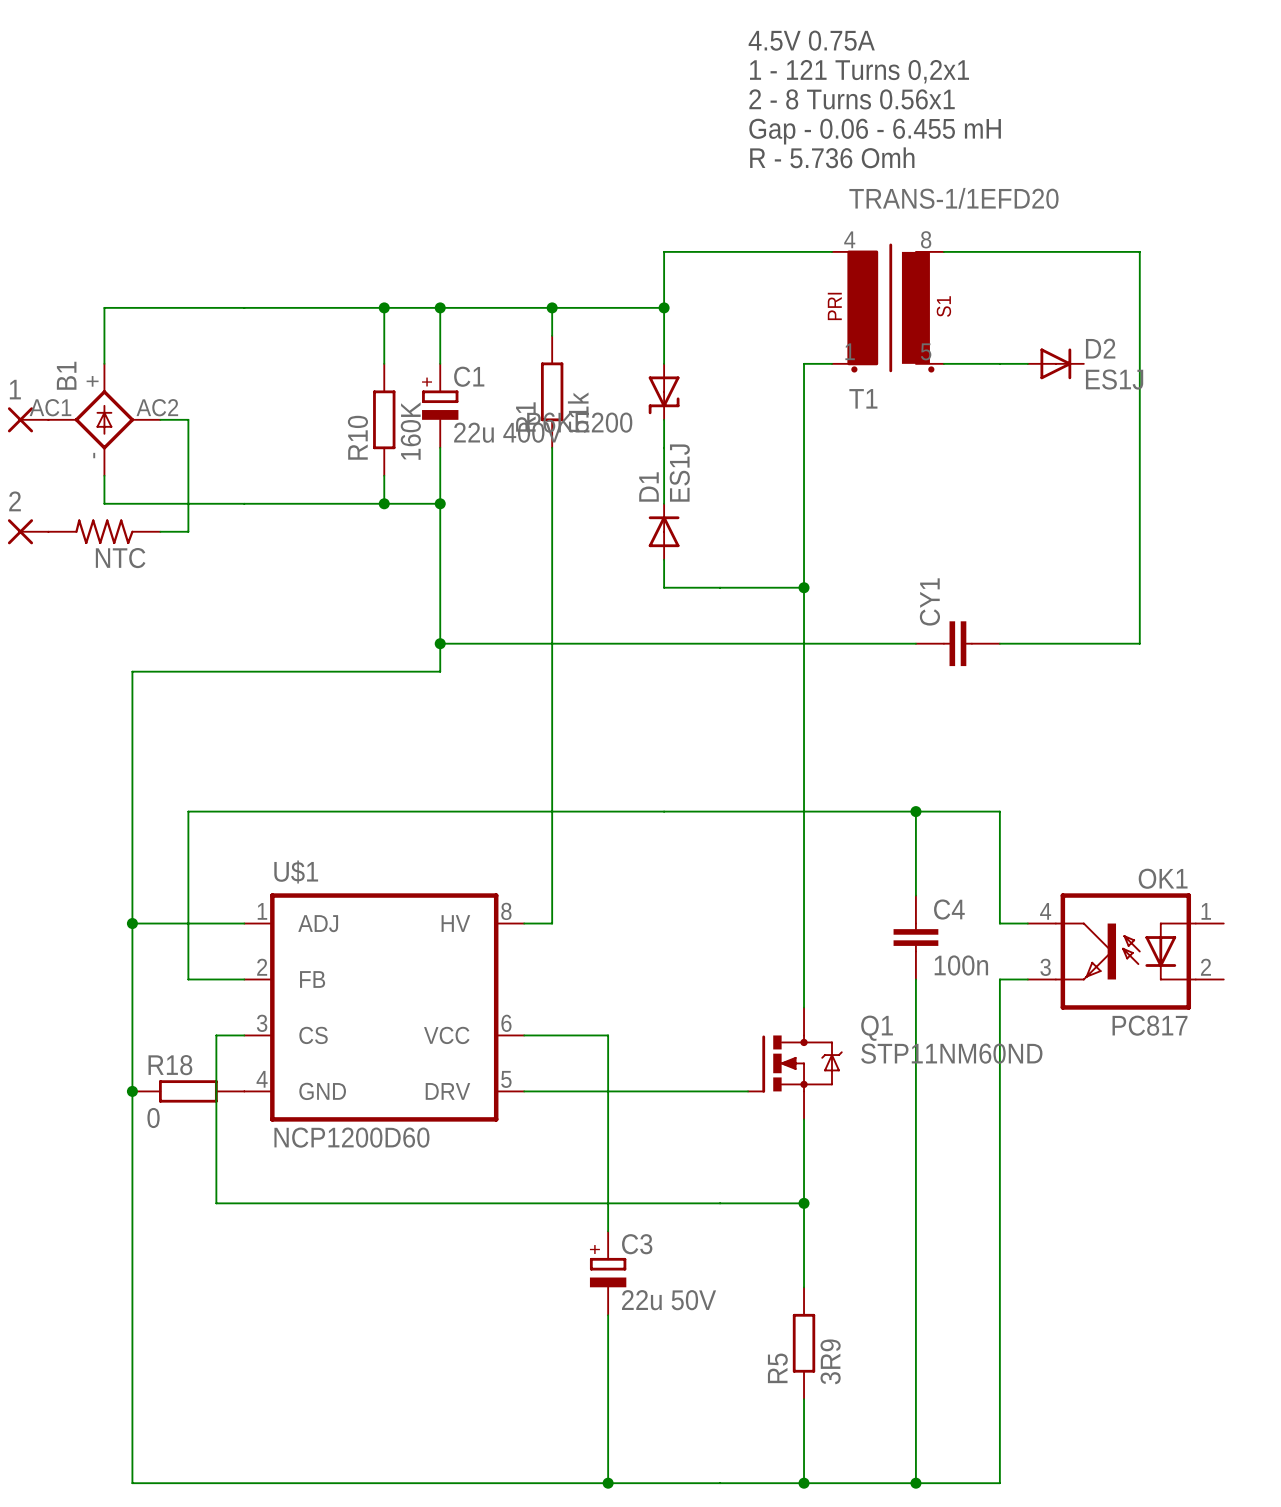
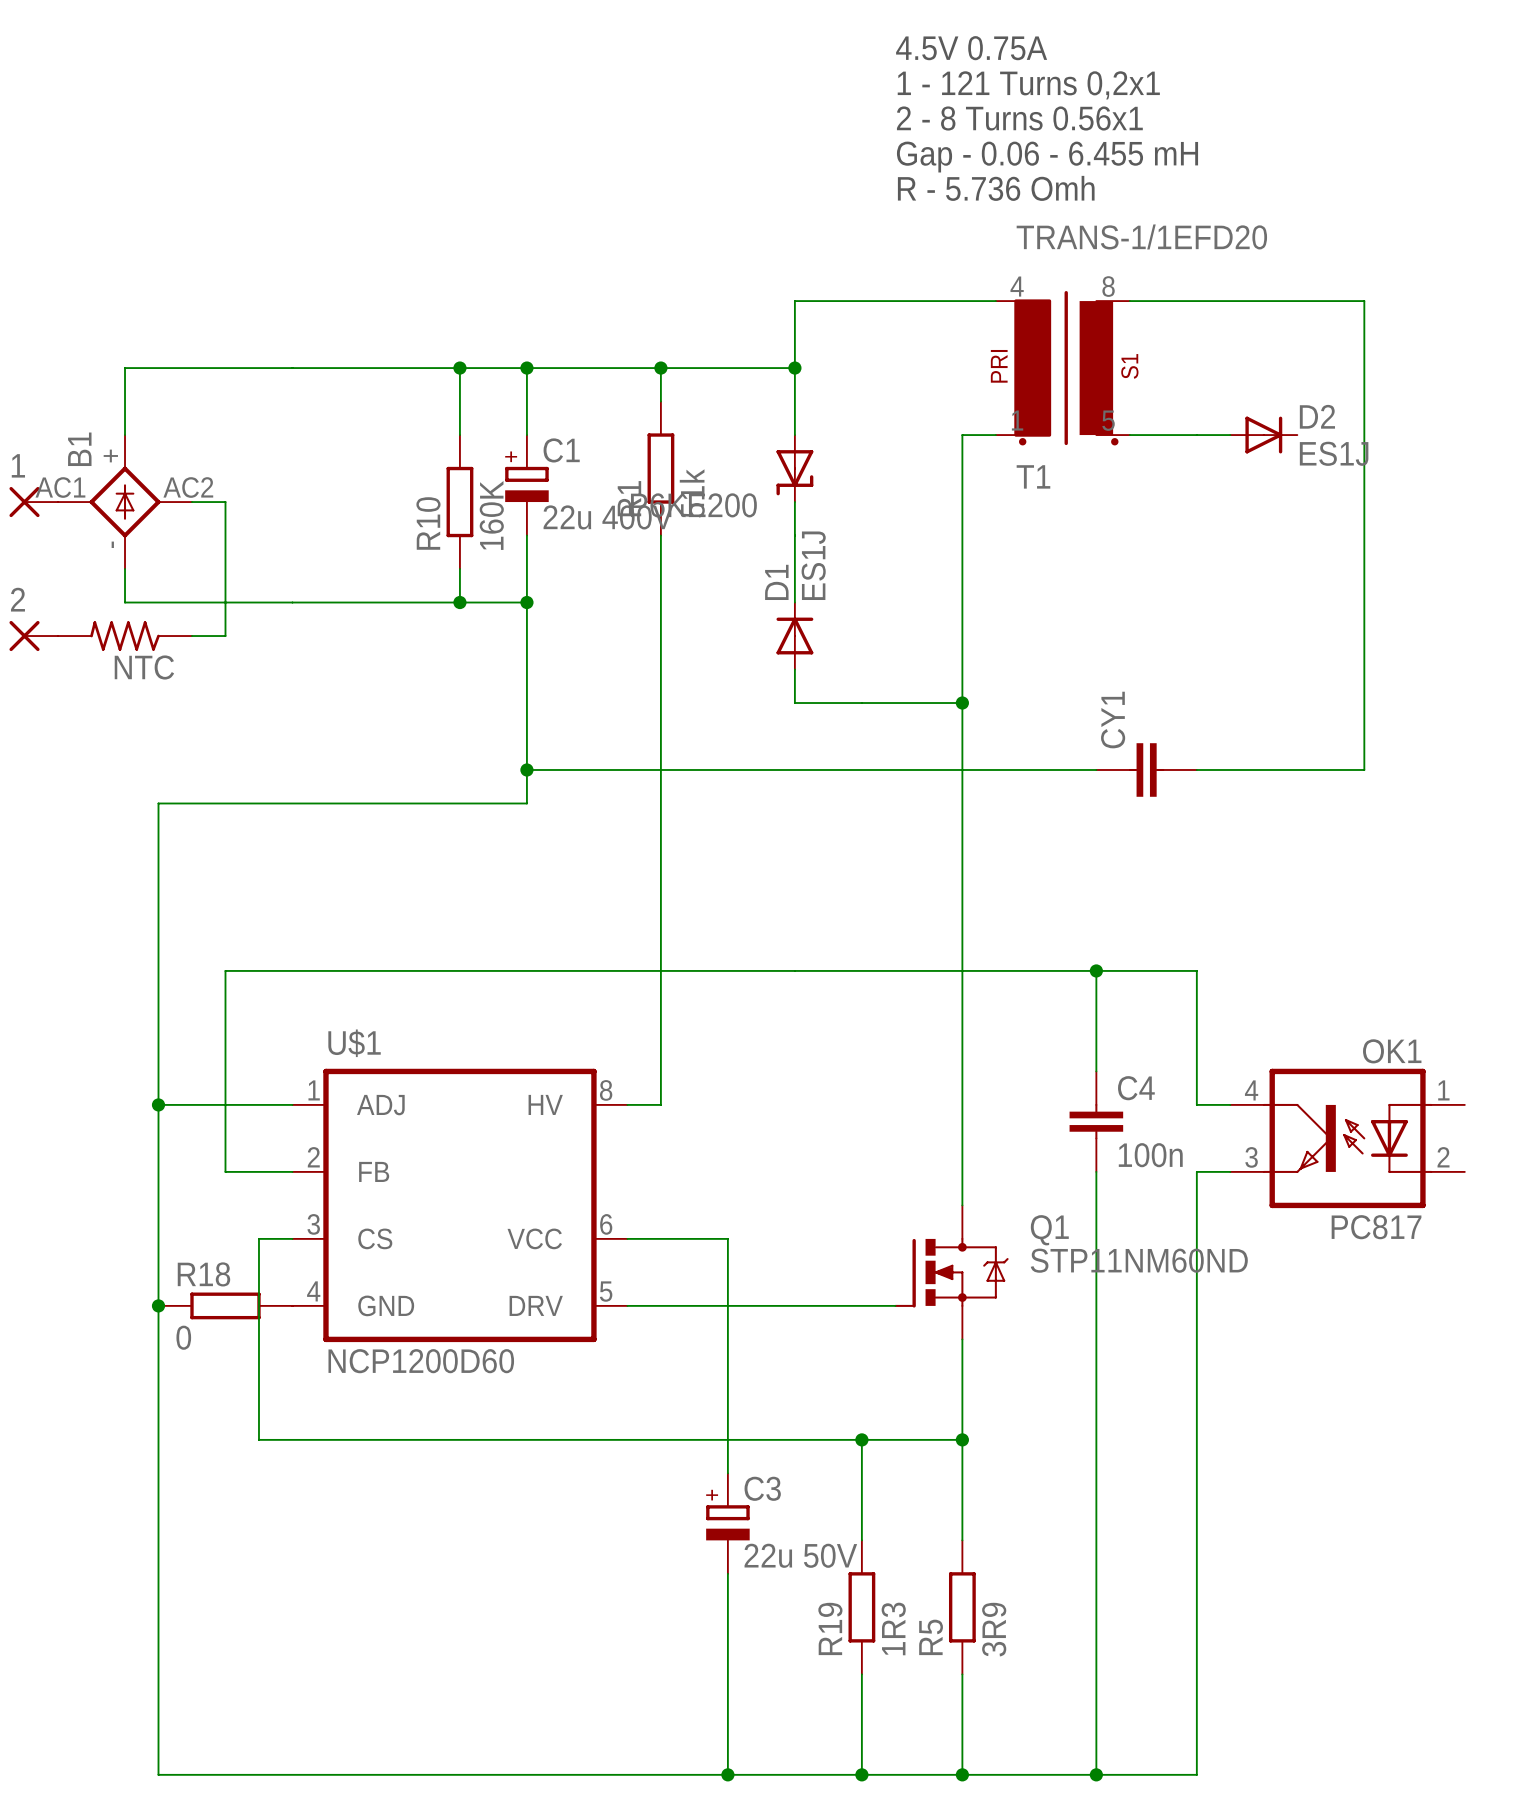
wire: none -> (861, 1439) (861, 1540)
junction: none -> (861, 1439)
R19: none -> 1R3 (861, 1607)
wire: none -> (861, 1674) (861, 1774)
junction: none -> (861, 1774)

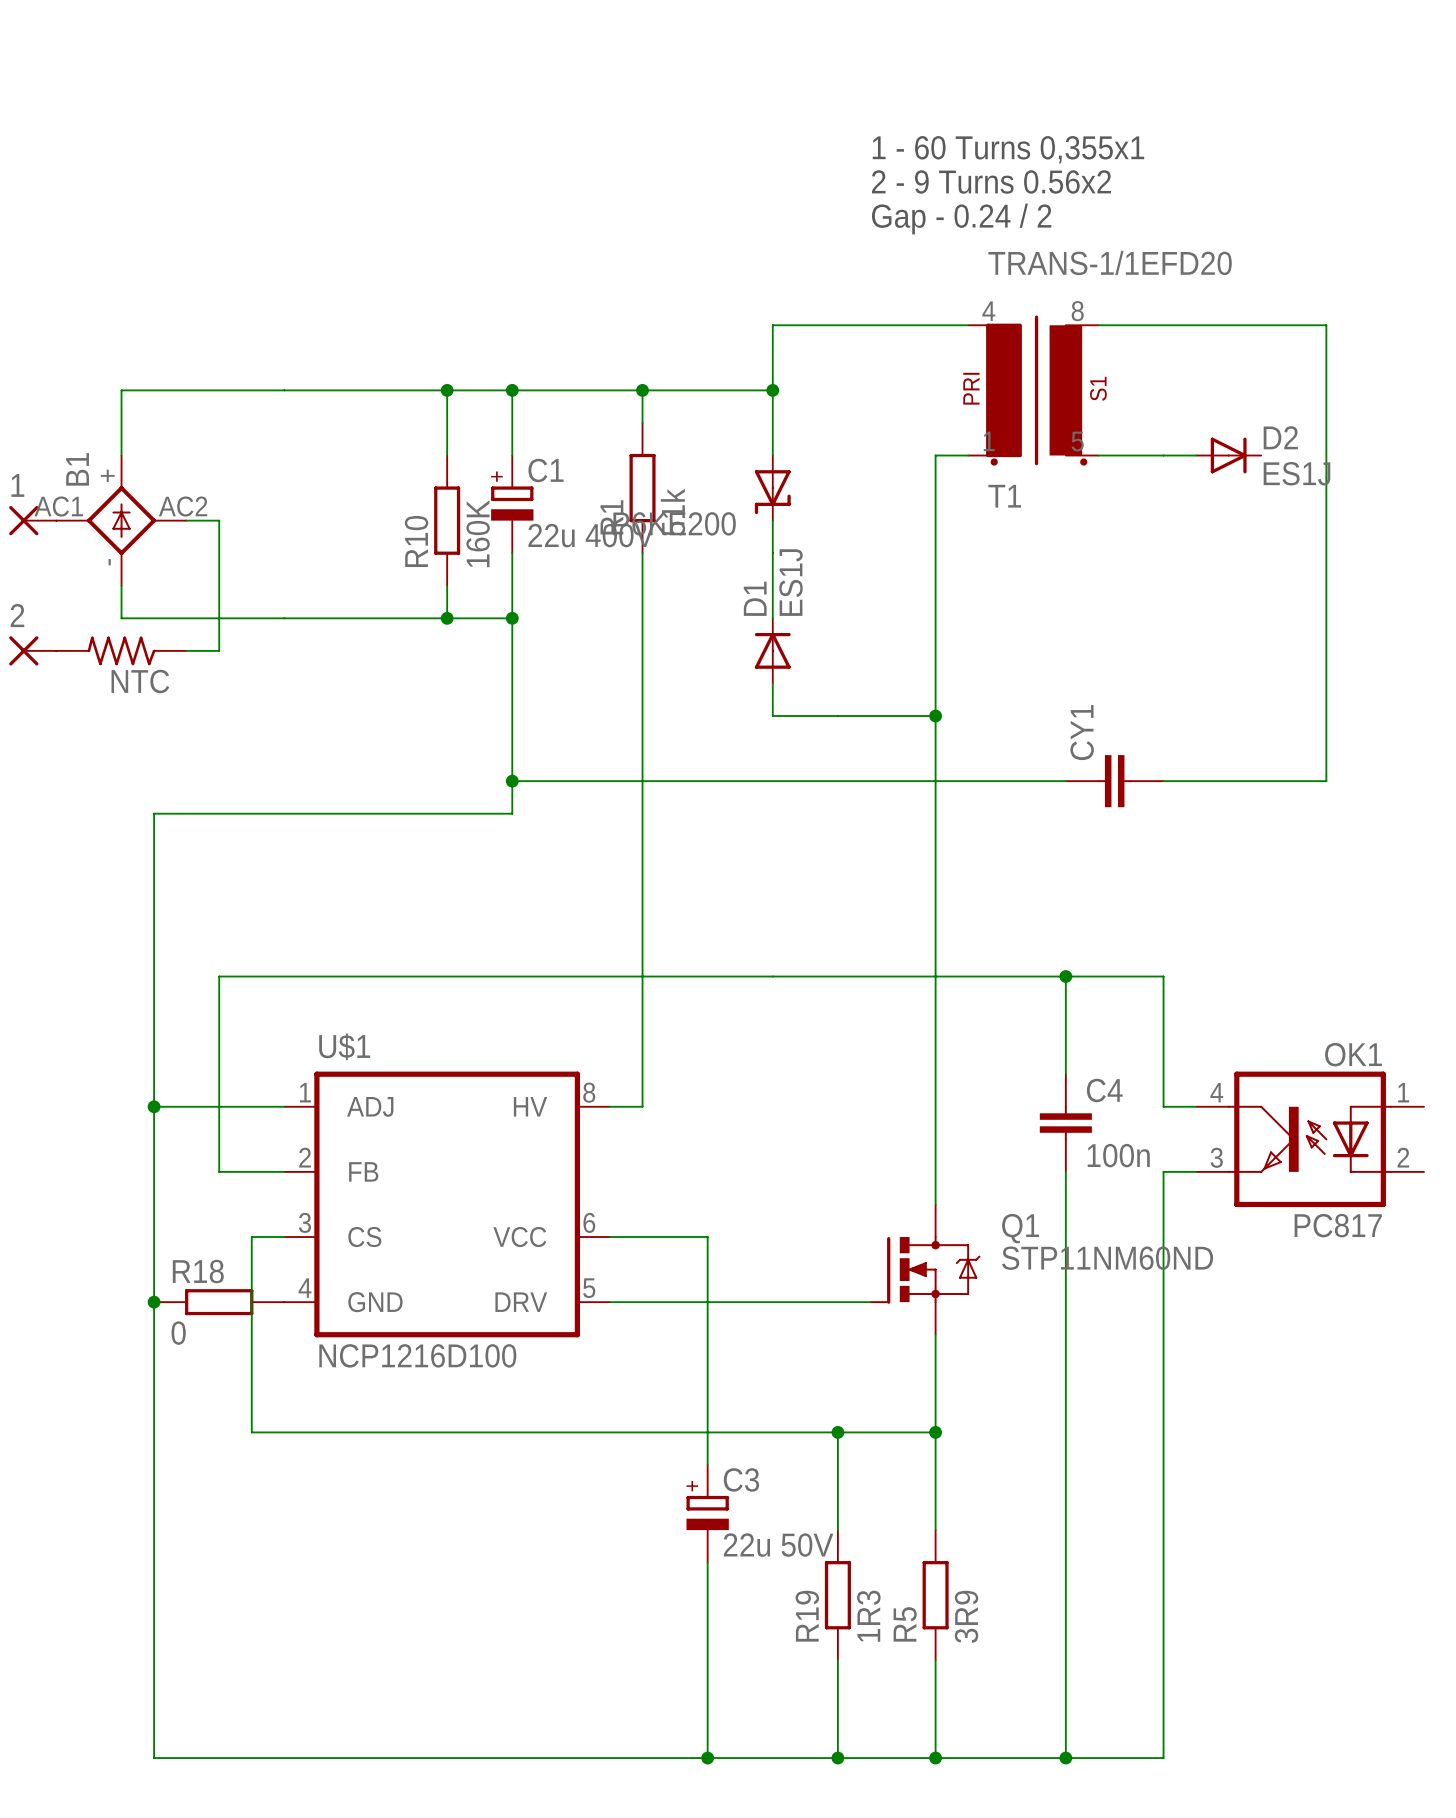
text: 4.5V 0.75A (971, 48) -> none
text: 1 - 121 Turns 0,2x1 (1028, 85) -> none
text: 2 - 8 Turns 0.56x1 (1019, 118) -> 1 - 60 Turns 0,355x1 (1008, 149)
text: Gap - 0.06 - 6.455 mH (1047, 157) -> 2 - 9 Turns 0.56x2 (991, 181)
text: R - 5.736 Omh (996, 188) -> Gap - 0.24 / 2 (961, 219)
U$1 value: NCP1200D60 (421, 1361) -> NCP1216D100 (417, 1355)

